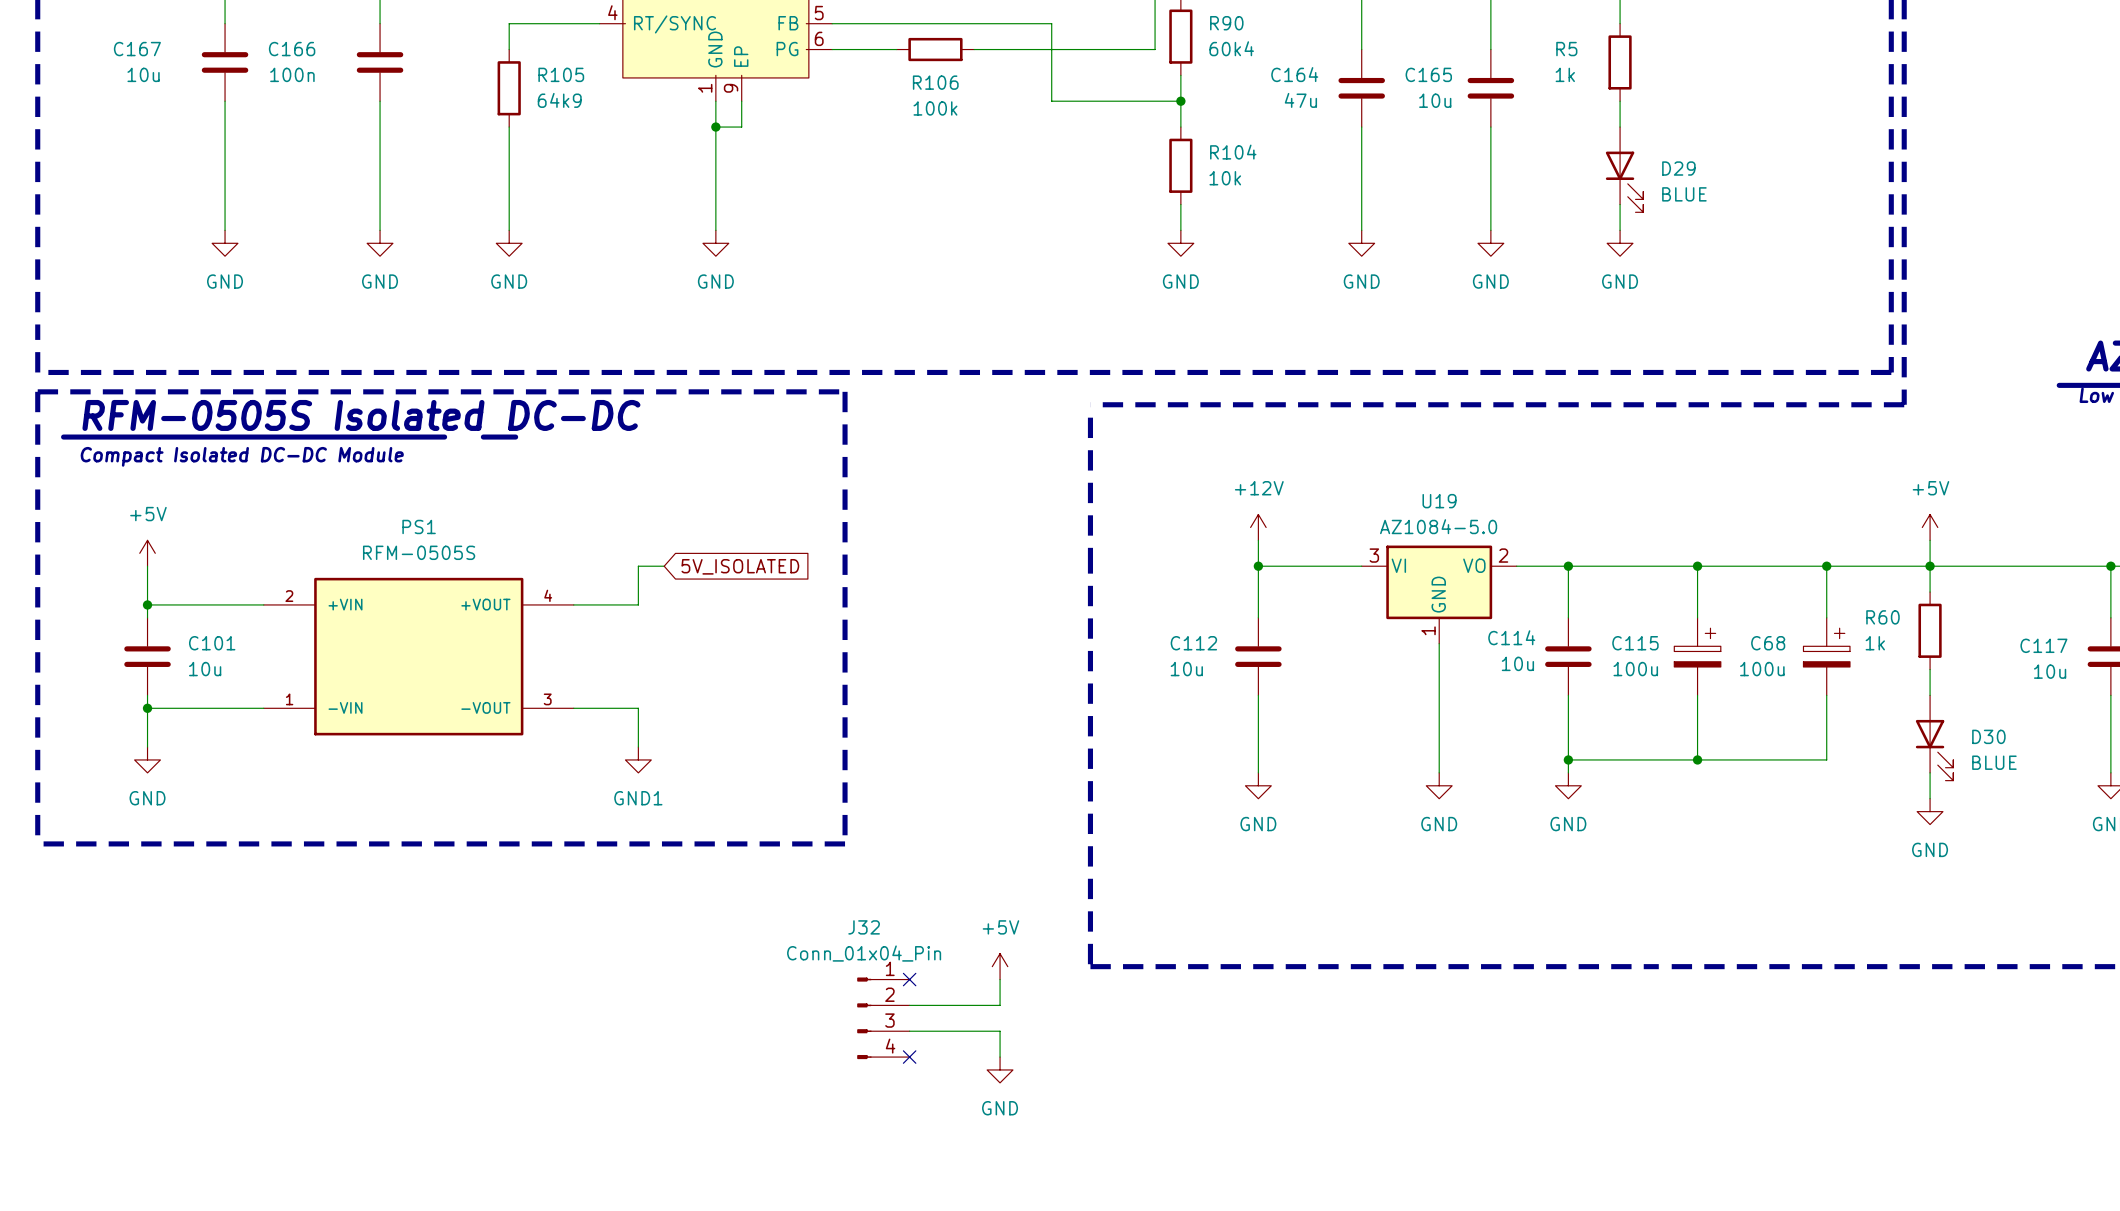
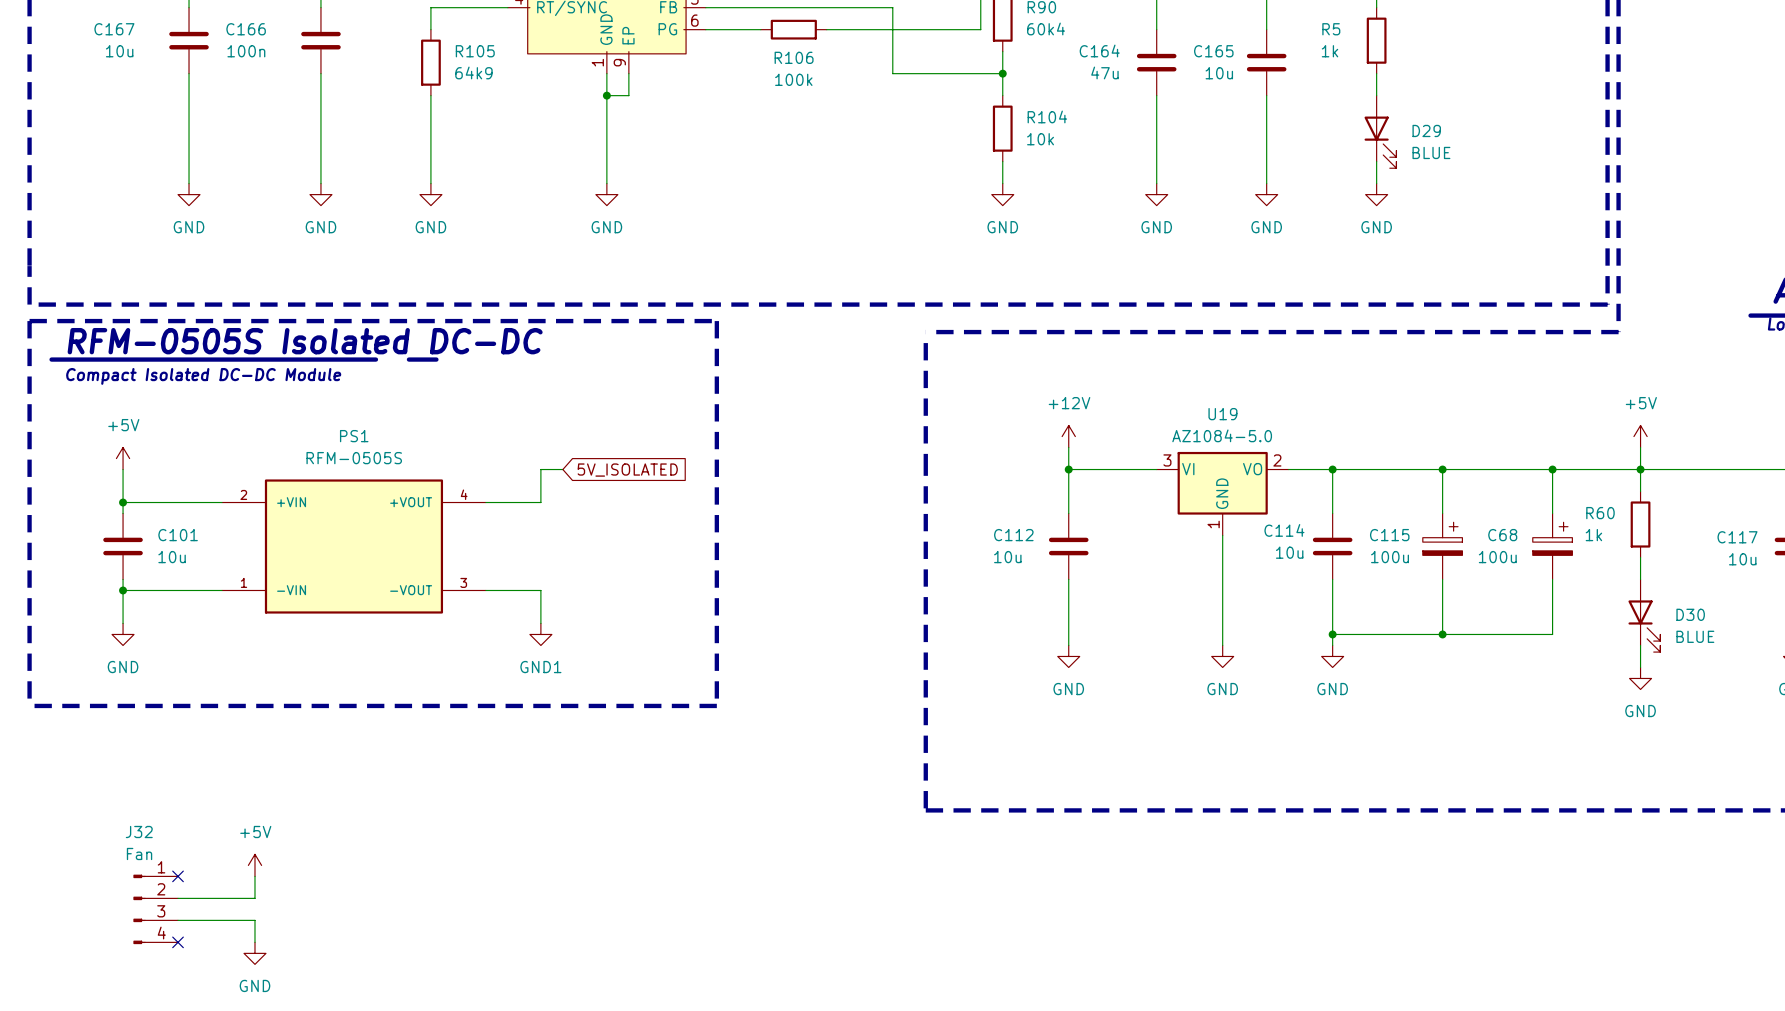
J32 value: Conn_01x04_Pin (864, 953) -> Fan (139, 853)
power symbol: +5V (1000, 966) -> none
no-connect mark: (909, 979) -> none
wire: (1000, 979) (1000, 1005) (909, 1005) -> none
J32 position: (883, 1018) -> (155, 909)
power symbol: none -> +5V (254, 865)
wire: (909, 1031) (1000, 1031) (1000, 1057) -> none
no-connect mark: none -> (178, 876)
wire: none -> (254, 876) (254, 898) (178, 898)
no-connect mark: (909, 1057) -> none
power symbol: GND (1000, 1069) -> none
wire: none -> (178, 920) (254, 920) (254, 942)
no-connect mark: none -> (178, 942)
power symbol: none -> GND (254, 953)

